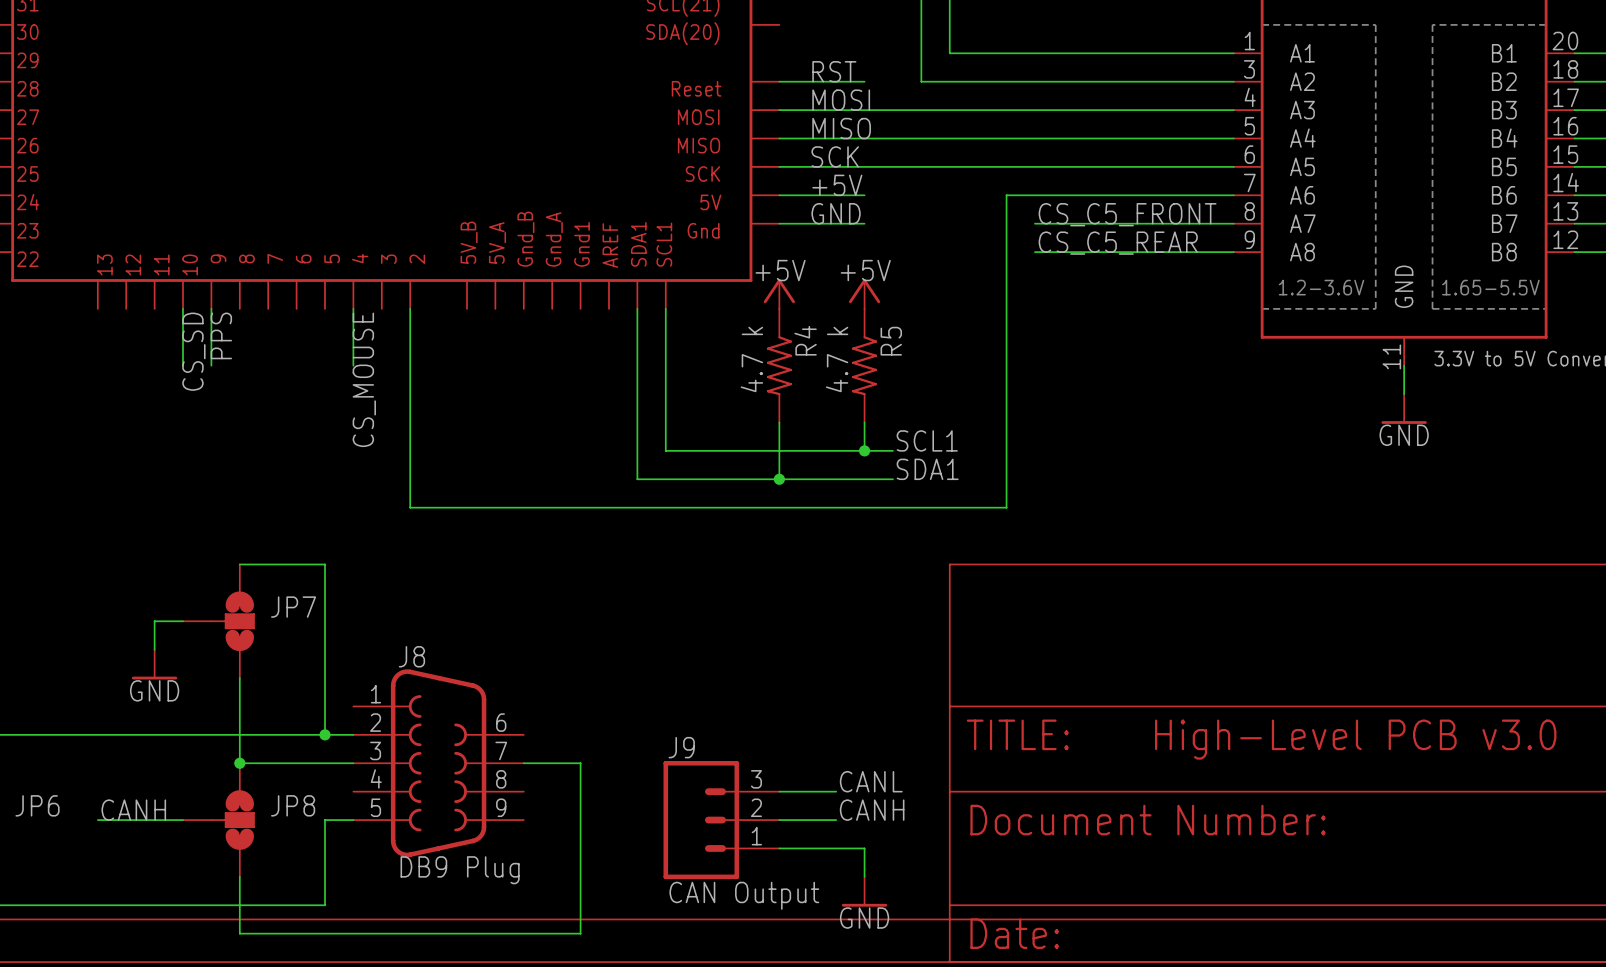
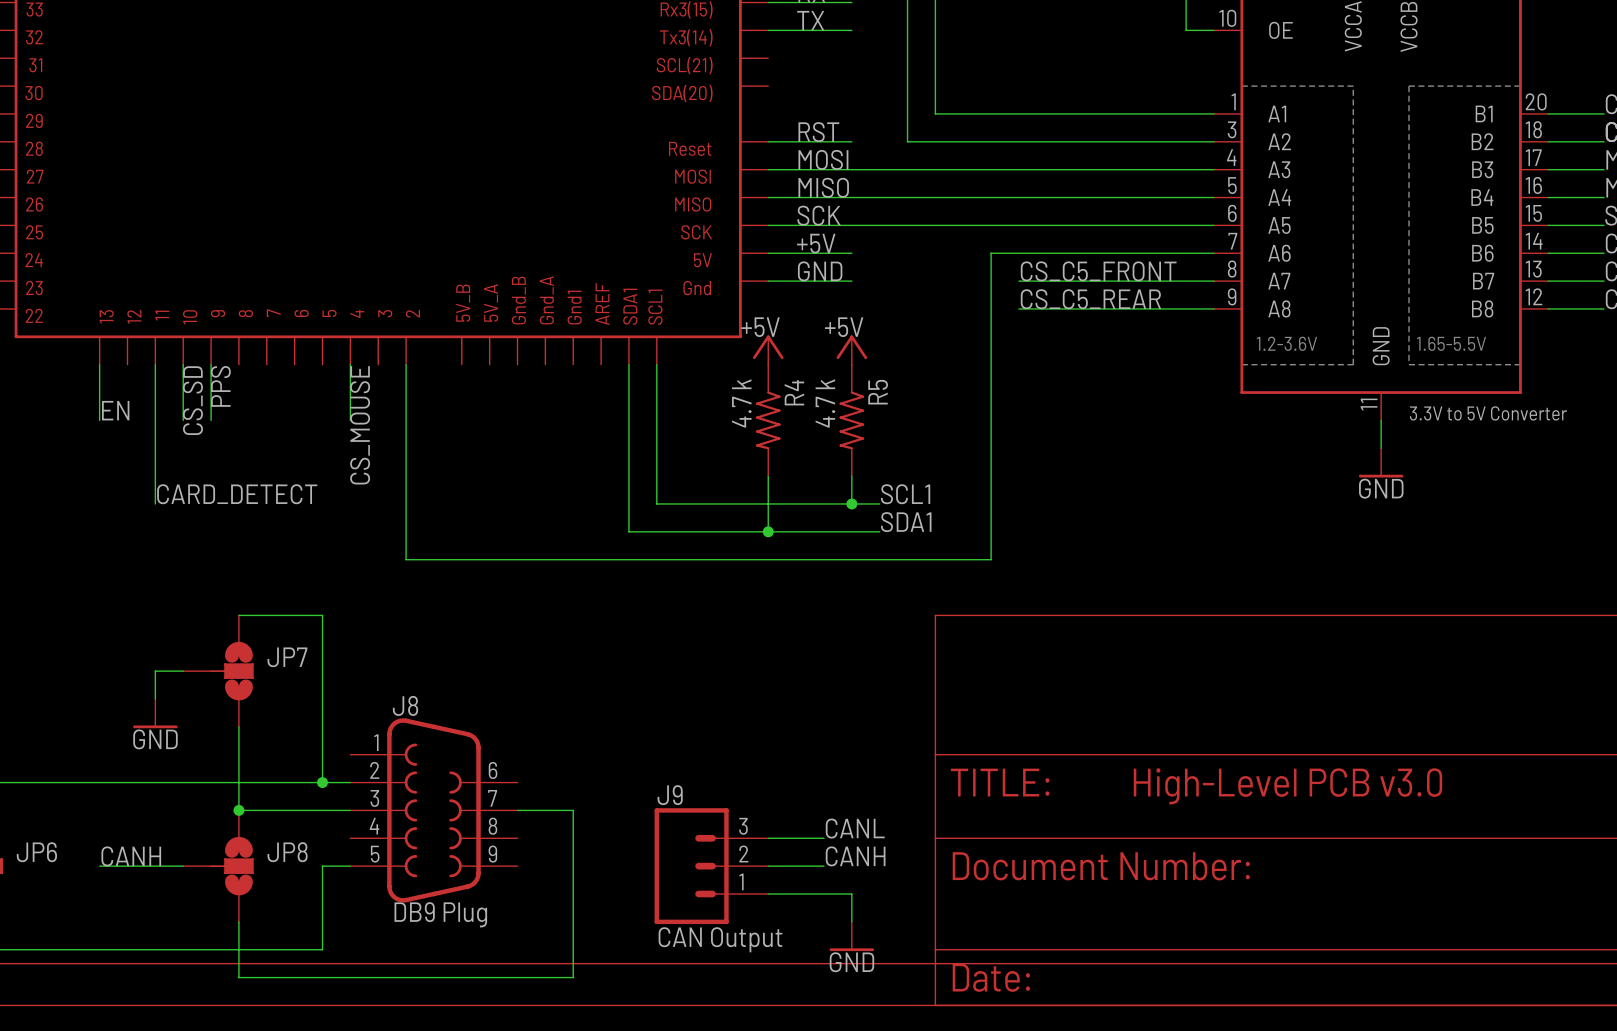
wire: none -> (99, 364) (99, 420)
wire: none -> (155, 364) (155, 503)
label: none -> EN (115, 410)
label: none -> CARD_DETECT (237, 494)

